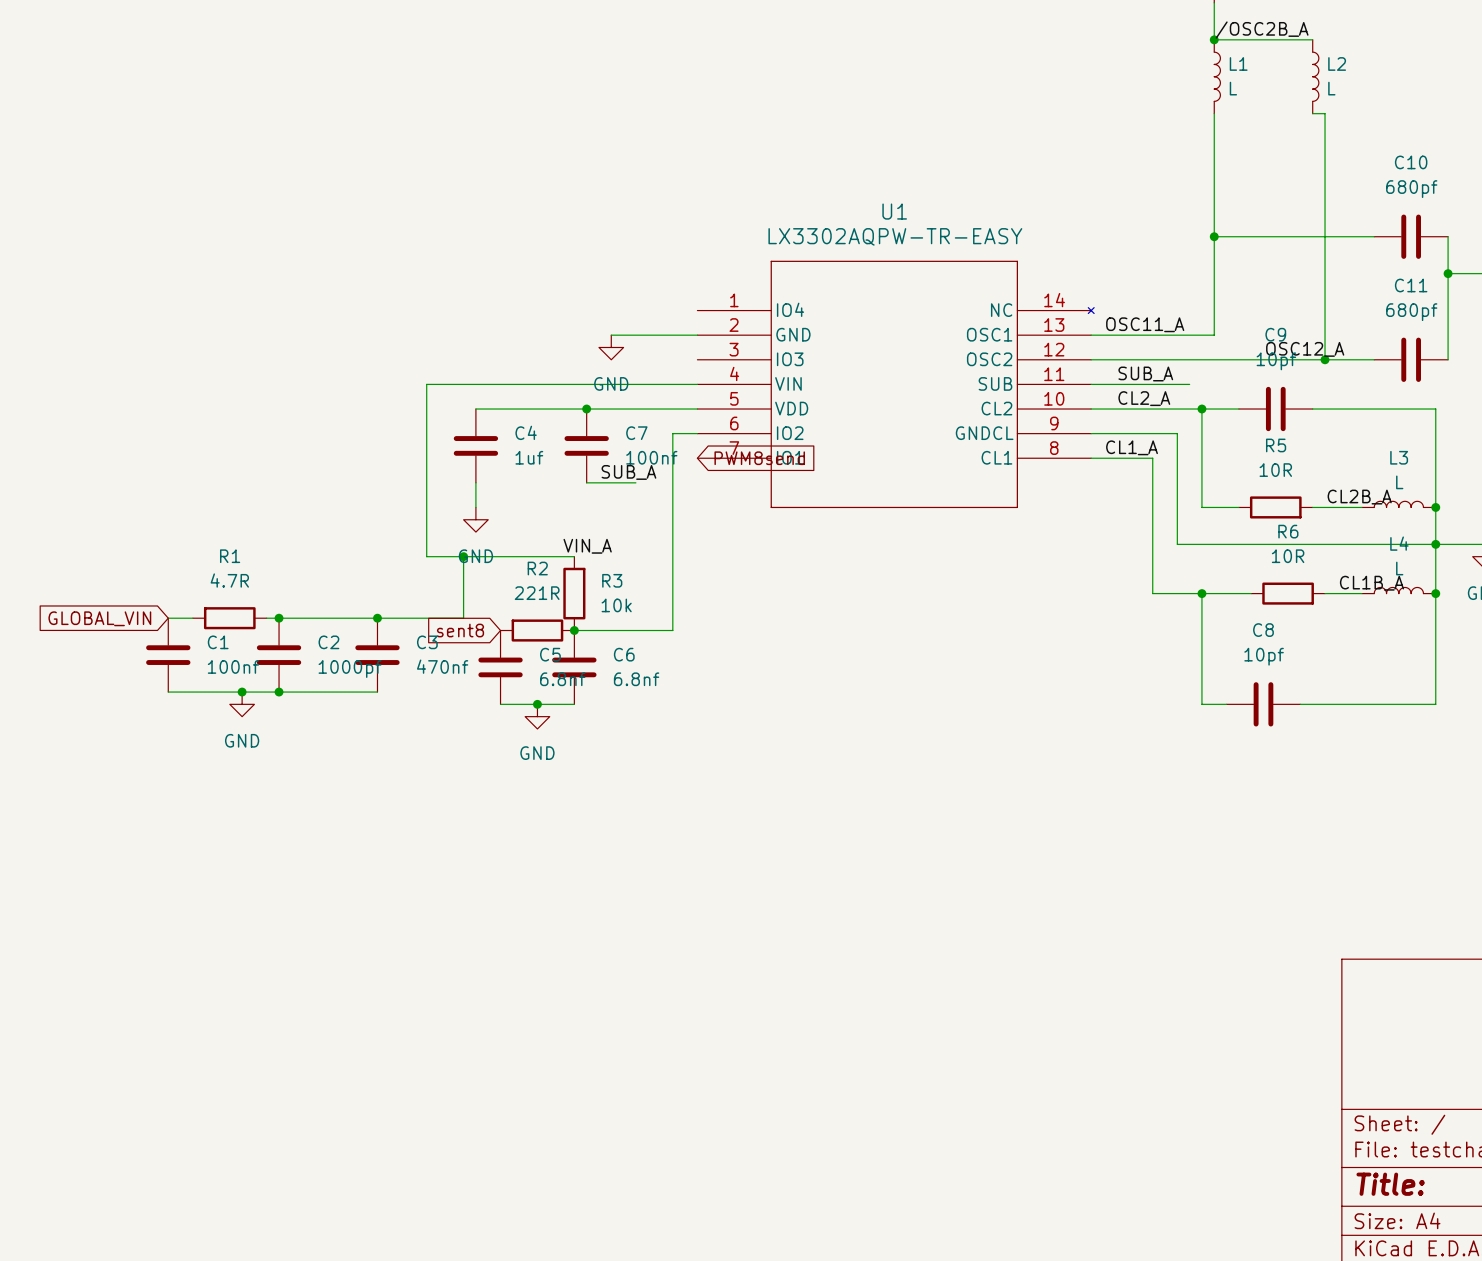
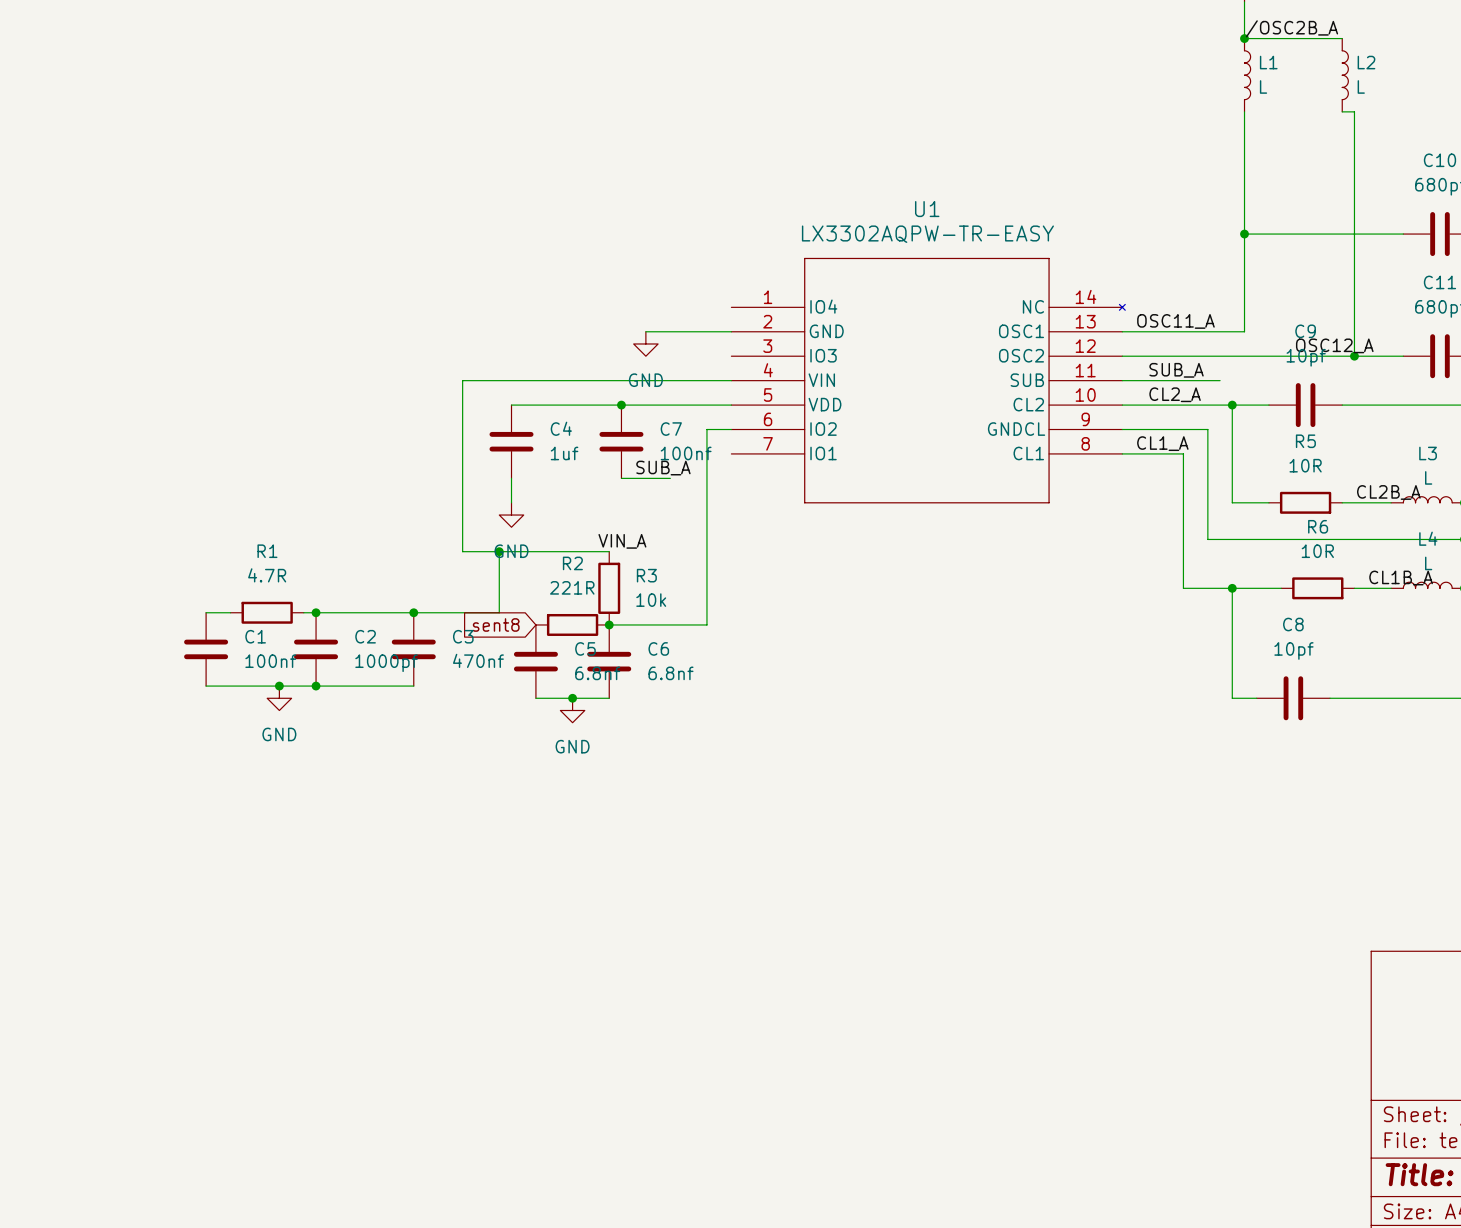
global label: PWM8send (759, 458) -> none
global label: GLOBAL_VIN (99, 618) -> none

